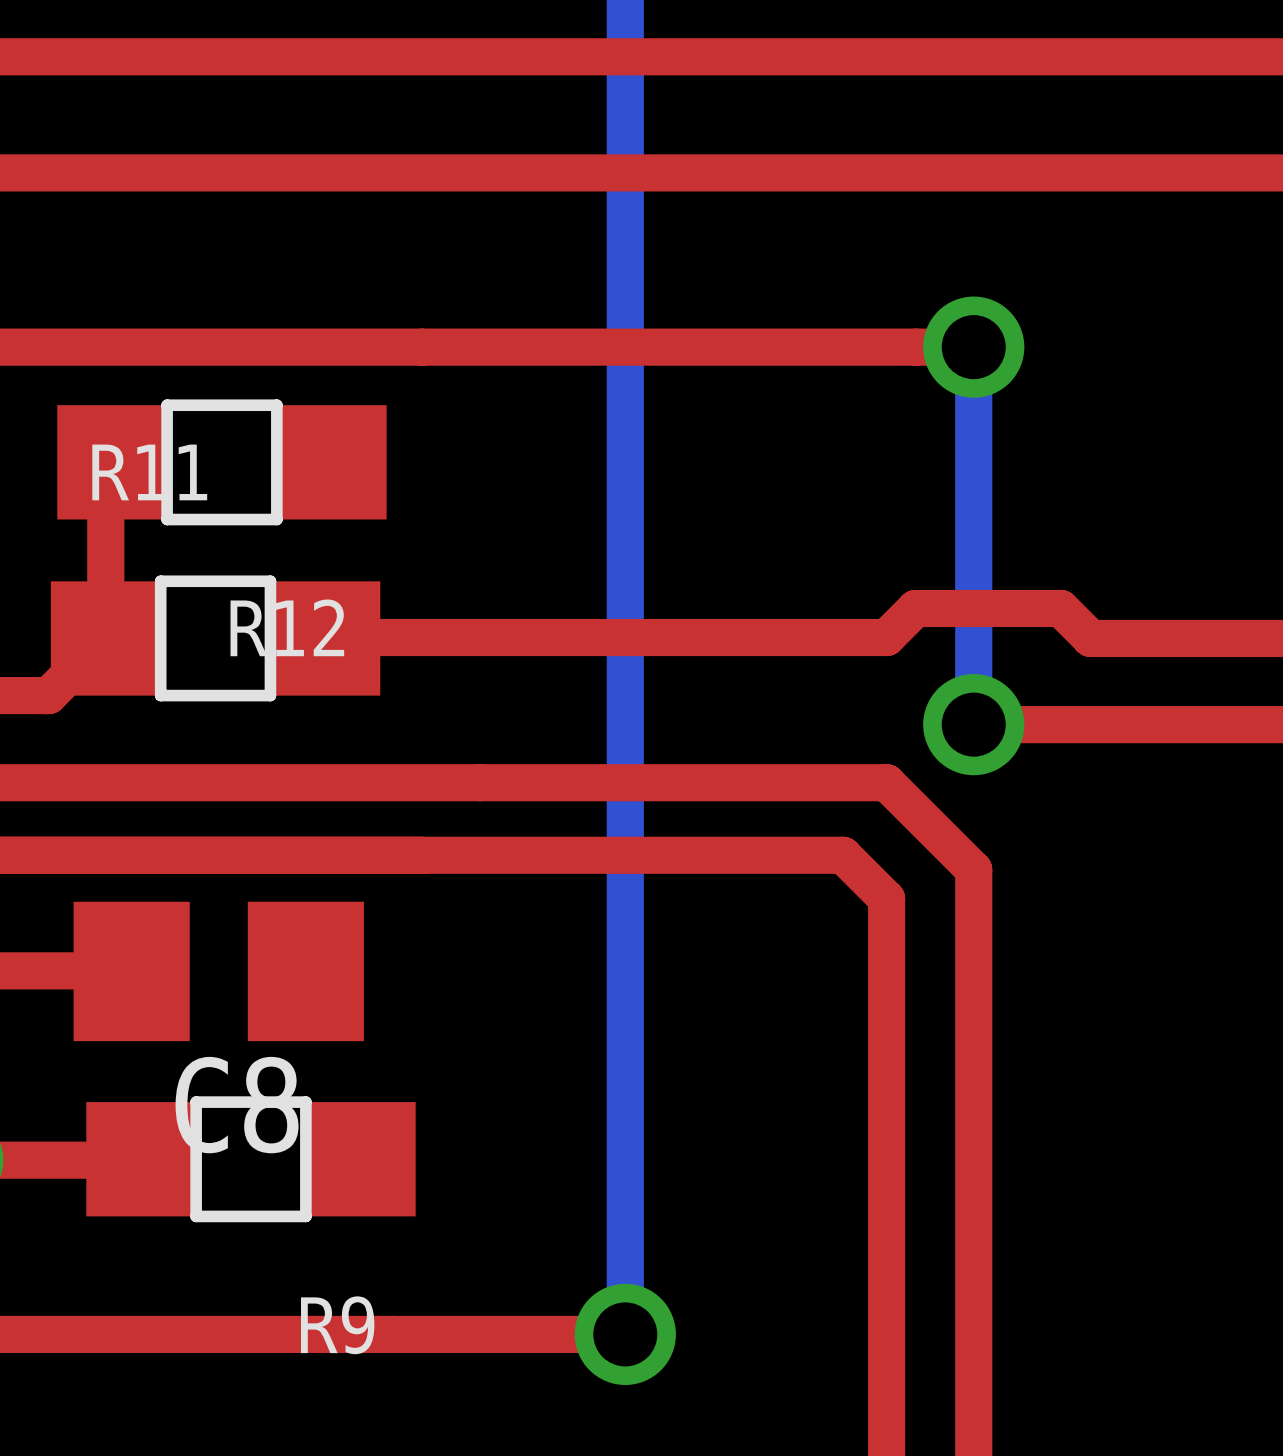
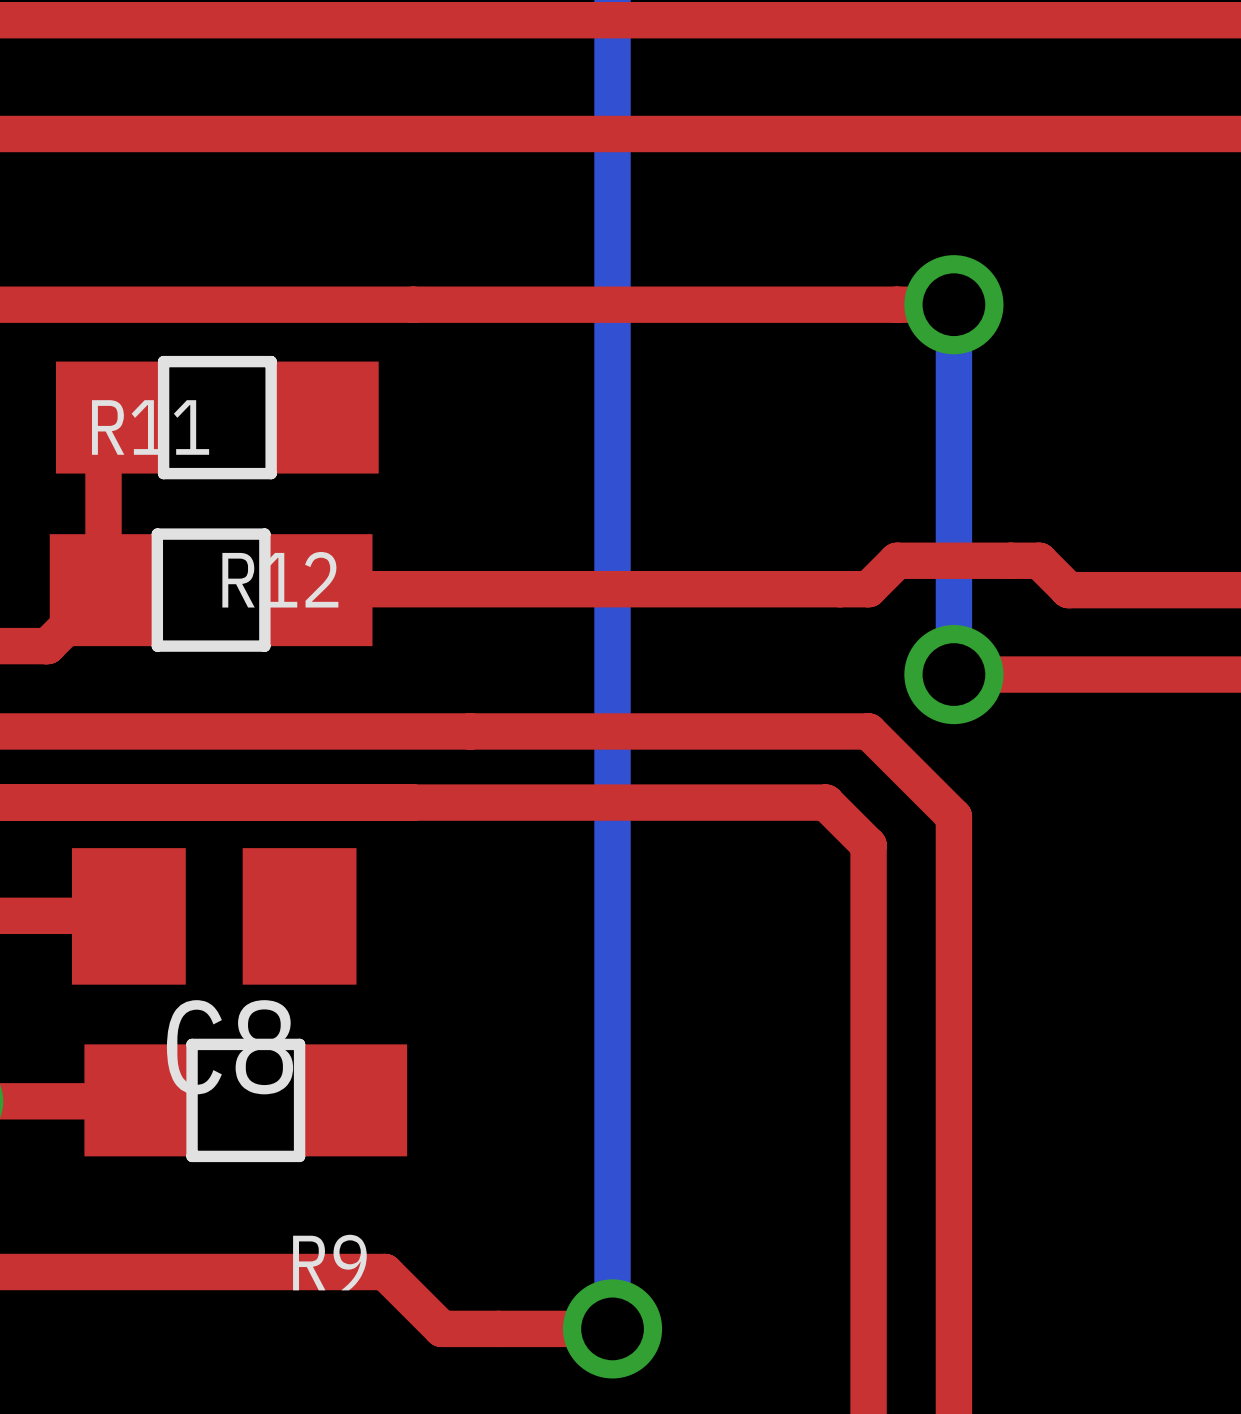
top track: (393, 1334) (625, 1334) -> (384, 1272) (441, 1328) (612, 1328)
via position: (625, 1334) -> (612, 1328)

